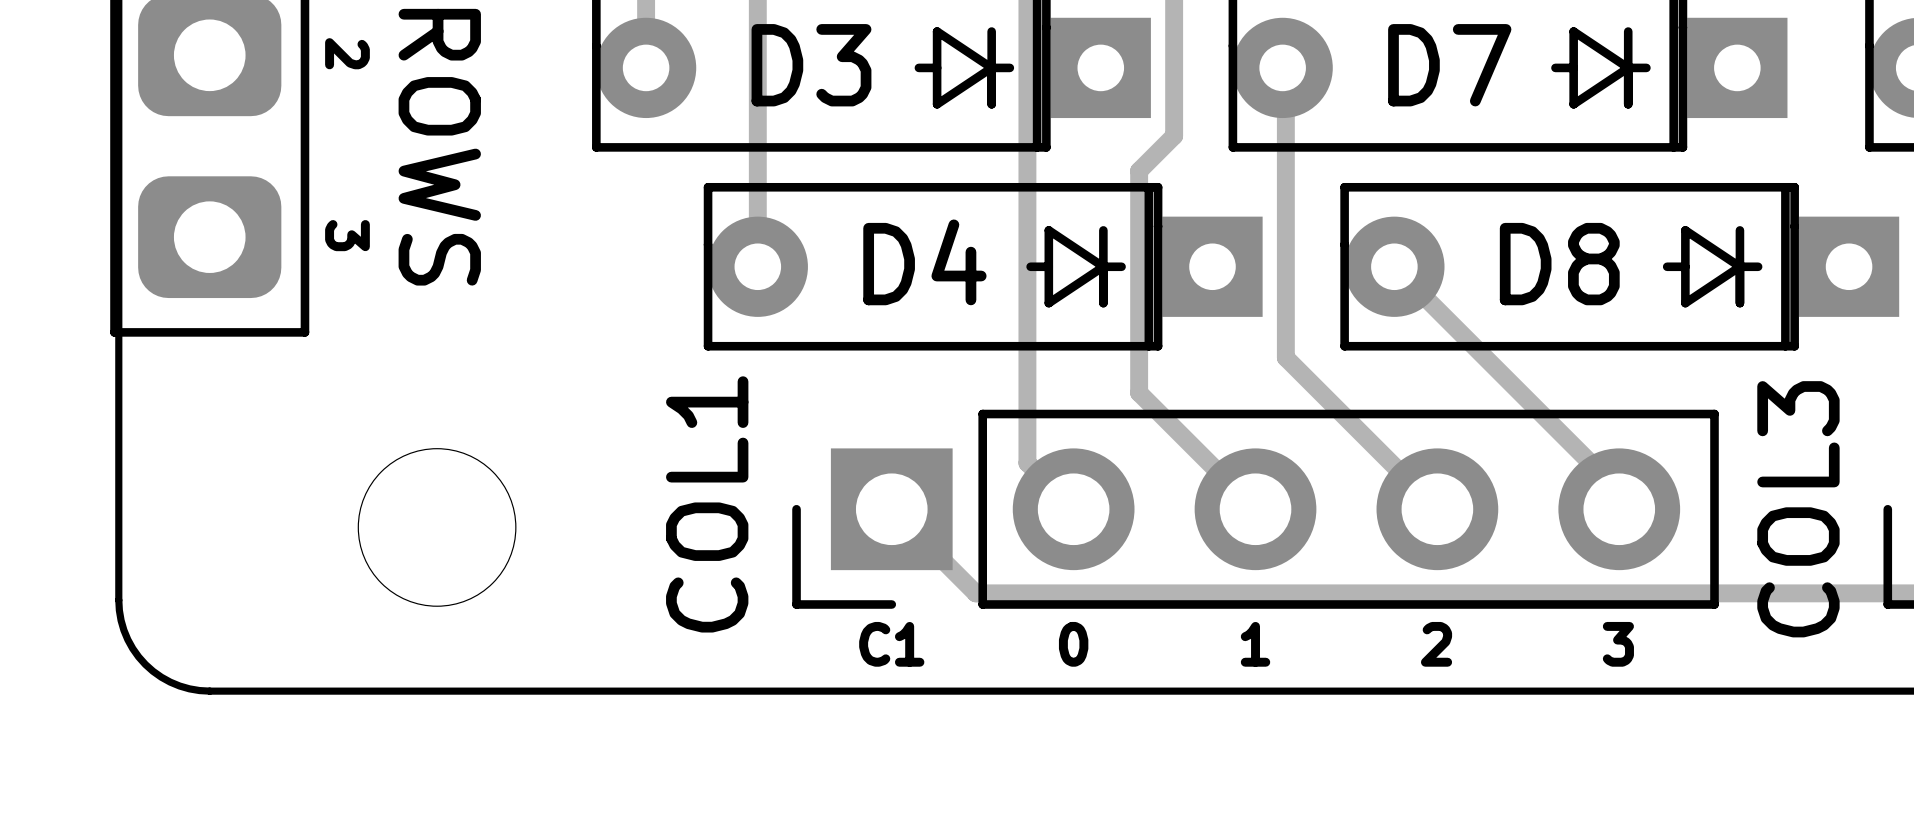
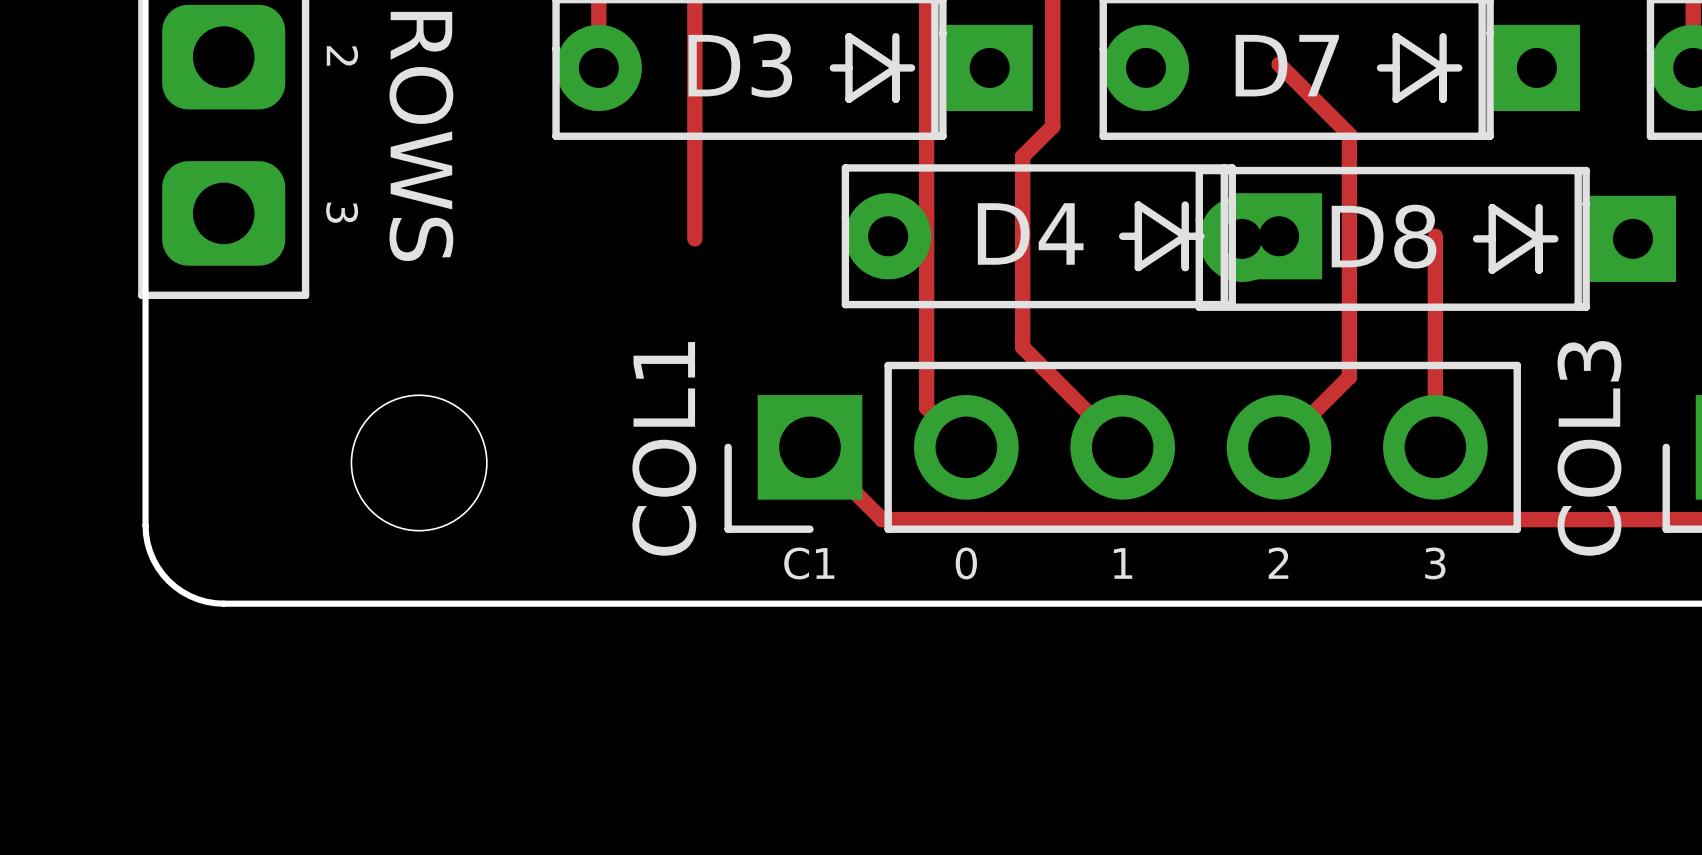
track: (1285, 71) (1285, 357) (1437, 509) -> (1279, 64) (1349, 134) (1349, 376) (1279, 447)
track: none -> (1435, 236) (1435, 447)
D4 position: (983, 266) -> (1081, 236)
track: (1394, 266) (1619, 491) -> none
COL1 name position: COL1 (707, 504) -> COL1 (664, 448)

